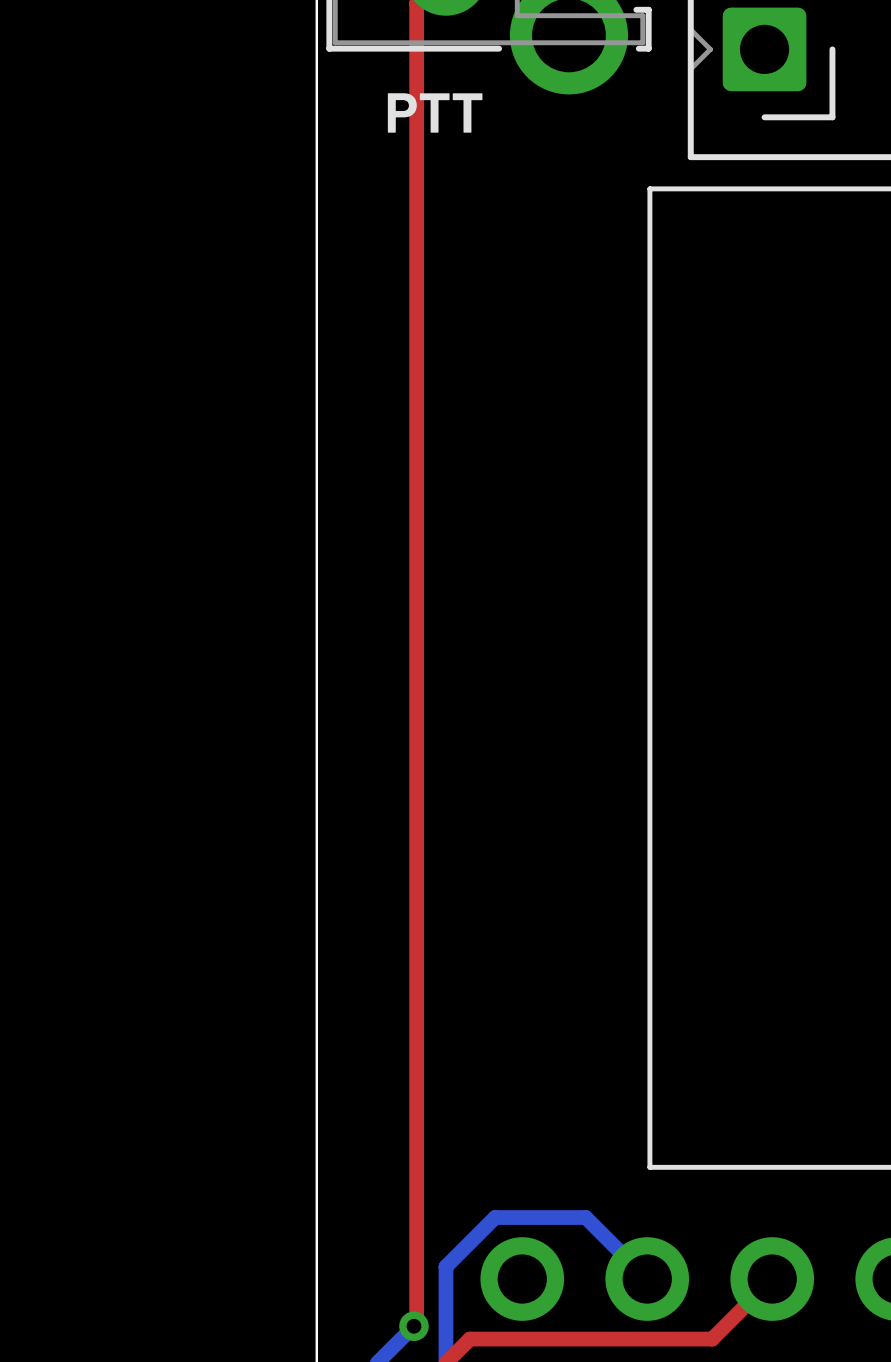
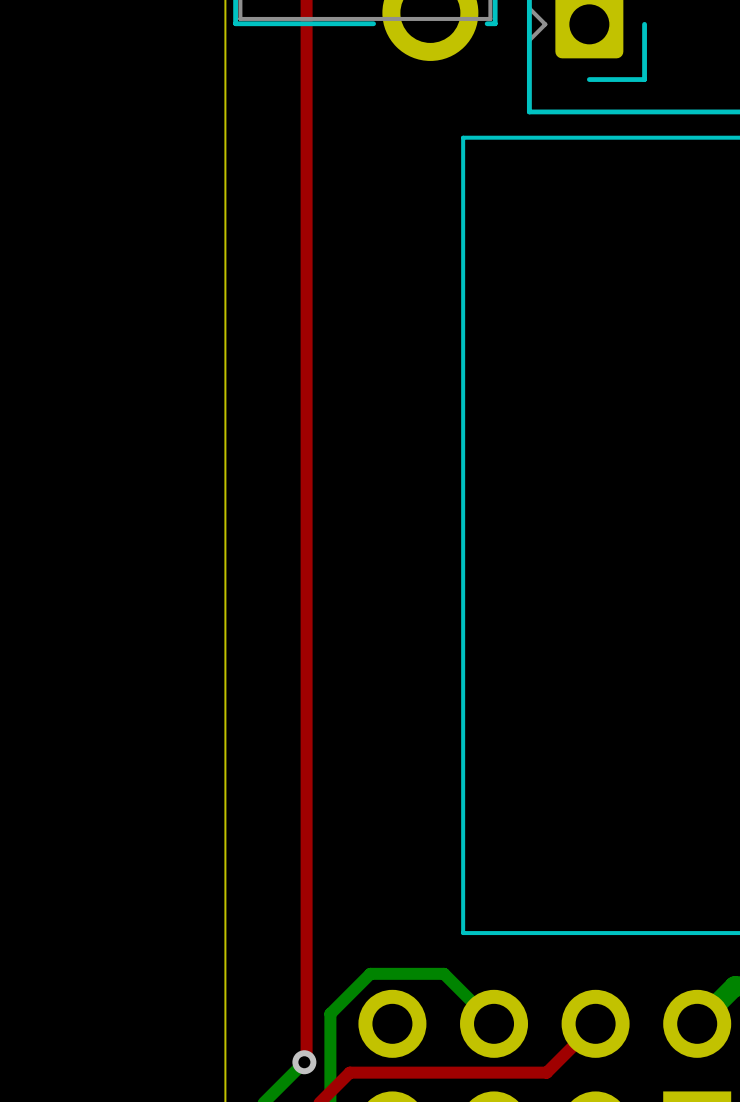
text: PTT (435, 112) -> none
line: (649, 188) (649, 1167) -> (496, 137) (463, 137) (463, 933) (496, 933)

